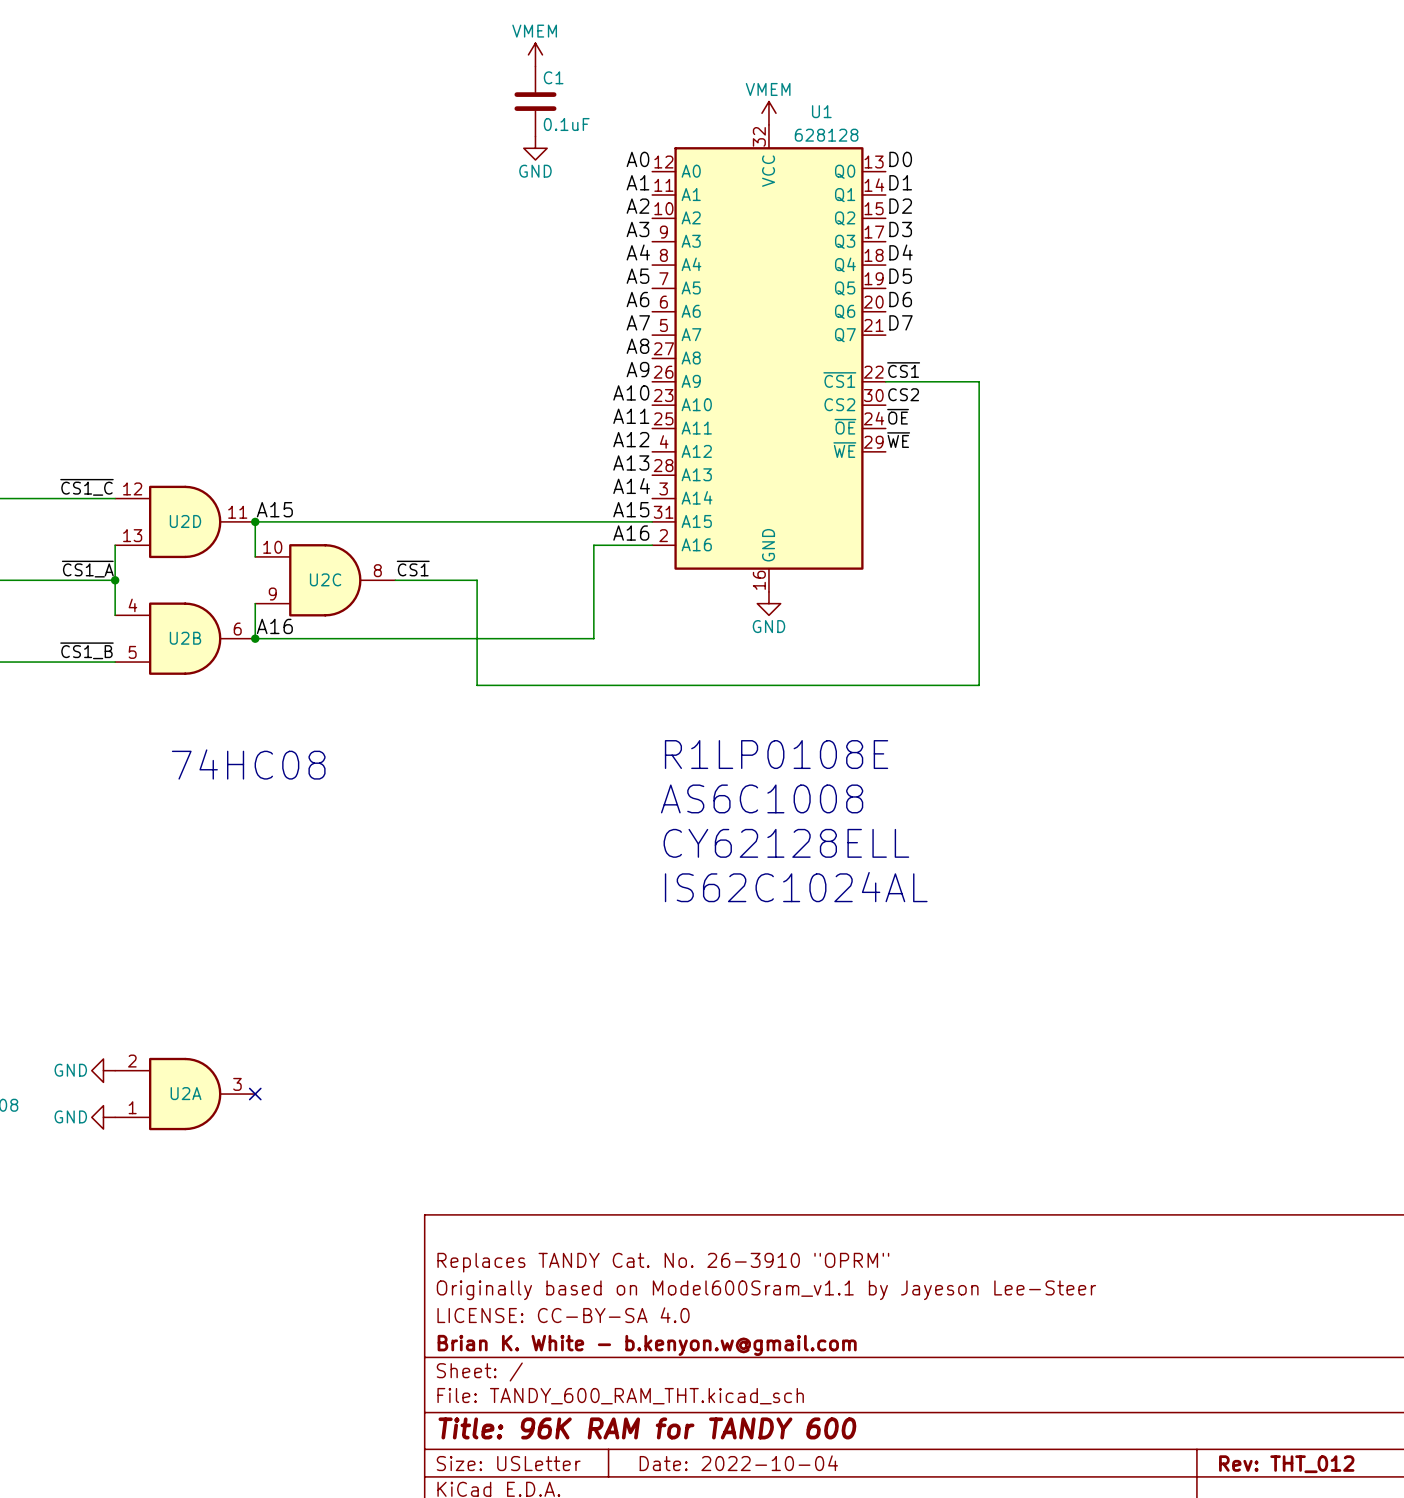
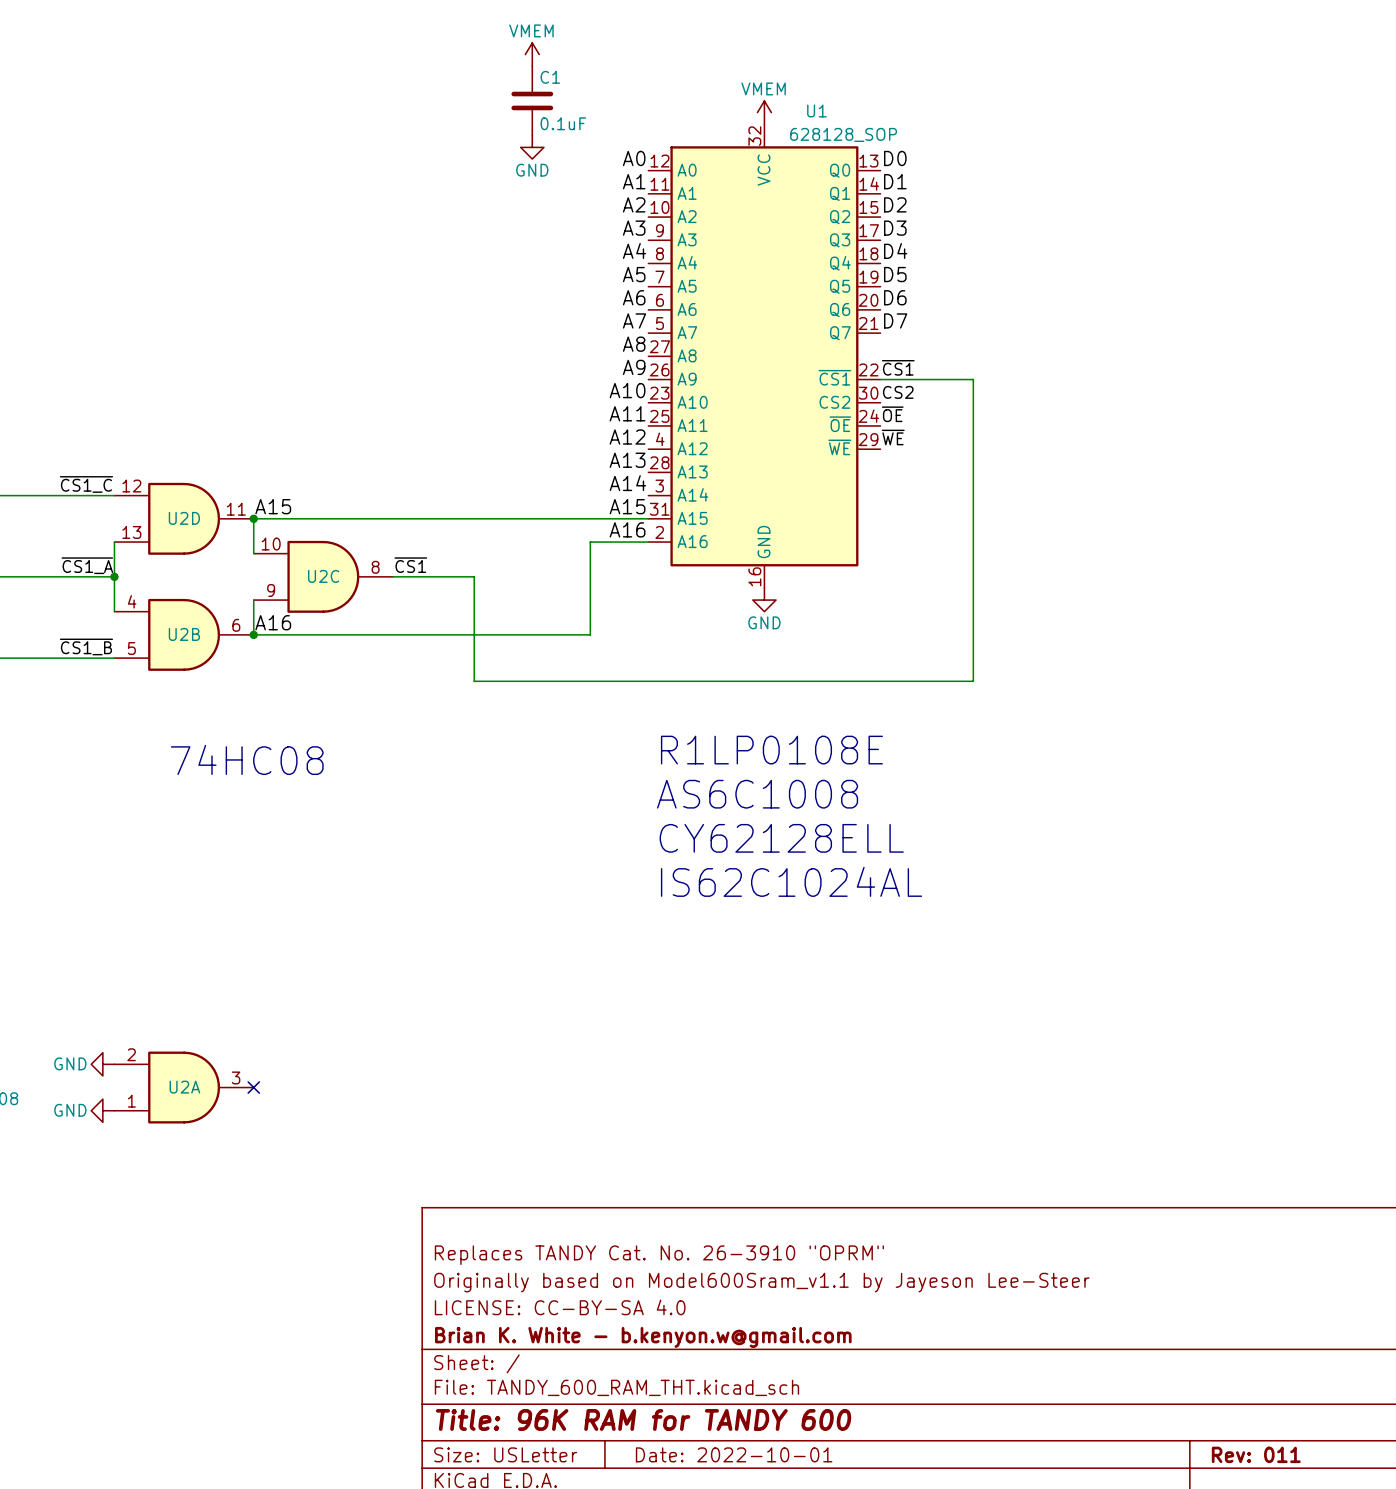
U1 value: 628128 (826, 135) -> 628128_SOP (843, 134)
title block: Date: 2022-10-04 (738, 1463) -> Date: 2022-10-01 (734, 1454)
title block: Rev: THT_012 (1286, 1464) -> Rev: 011 (1256, 1454)

